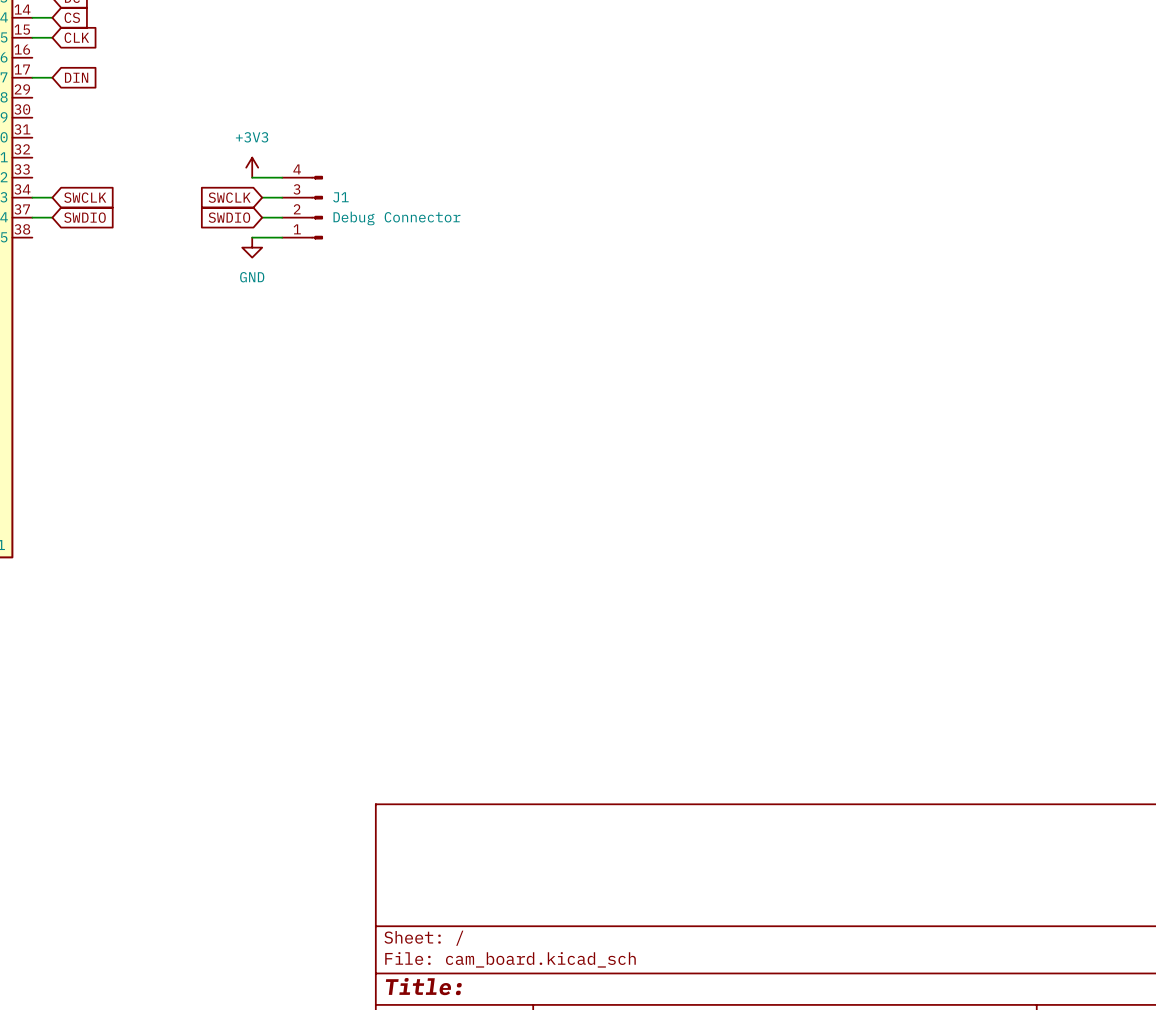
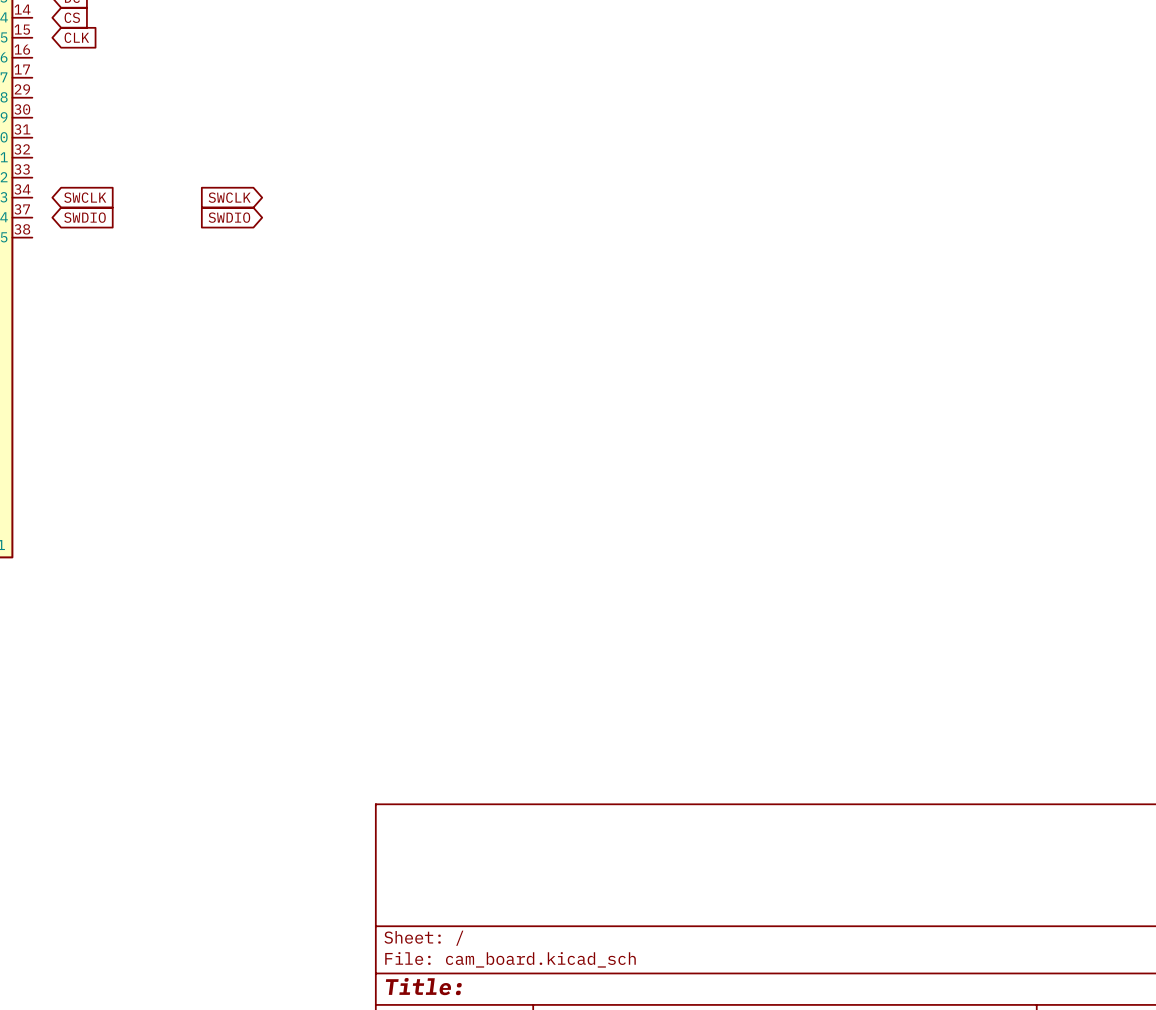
wire: (32, 17) (52, 17) -> none
wire: (32, 37) (52, 37) -> none
wire: (32, 77) (52, 77) -> none
global label: DIN (76, 77) -> none
power symbol: +3V3 (252, 167) -> none
wire: (252, 177) (282, 177) -> none
wire: (32, 197) (52, 197) -> none
wire: (262, 197) (282, 197) -> none
J1: Debug Connector (302, 207) -> none
wire: (32, 217) (52, 217) -> none
wire: (262, 217) (282, 217) -> none
wire: (252, 237) (282, 237) -> none
power symbol: GND (252, 247) -> none

